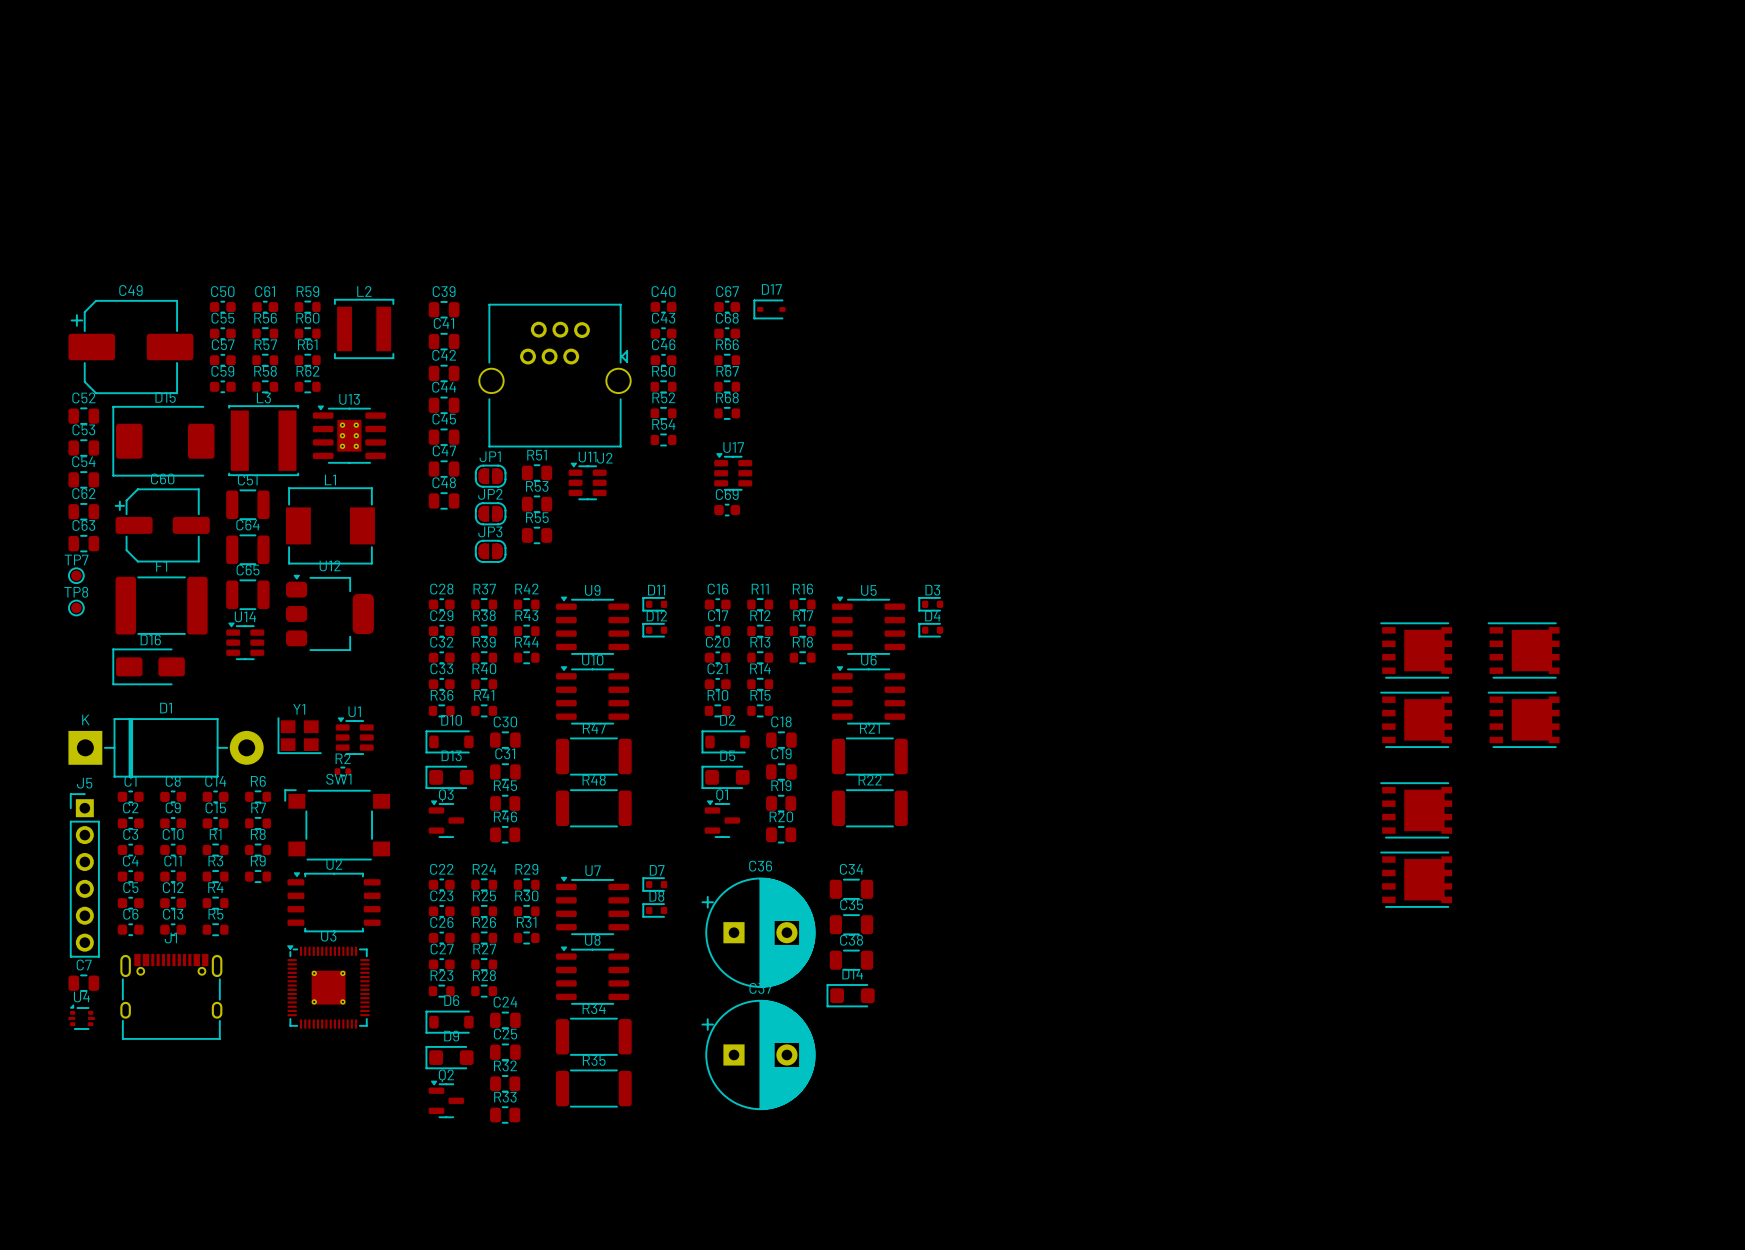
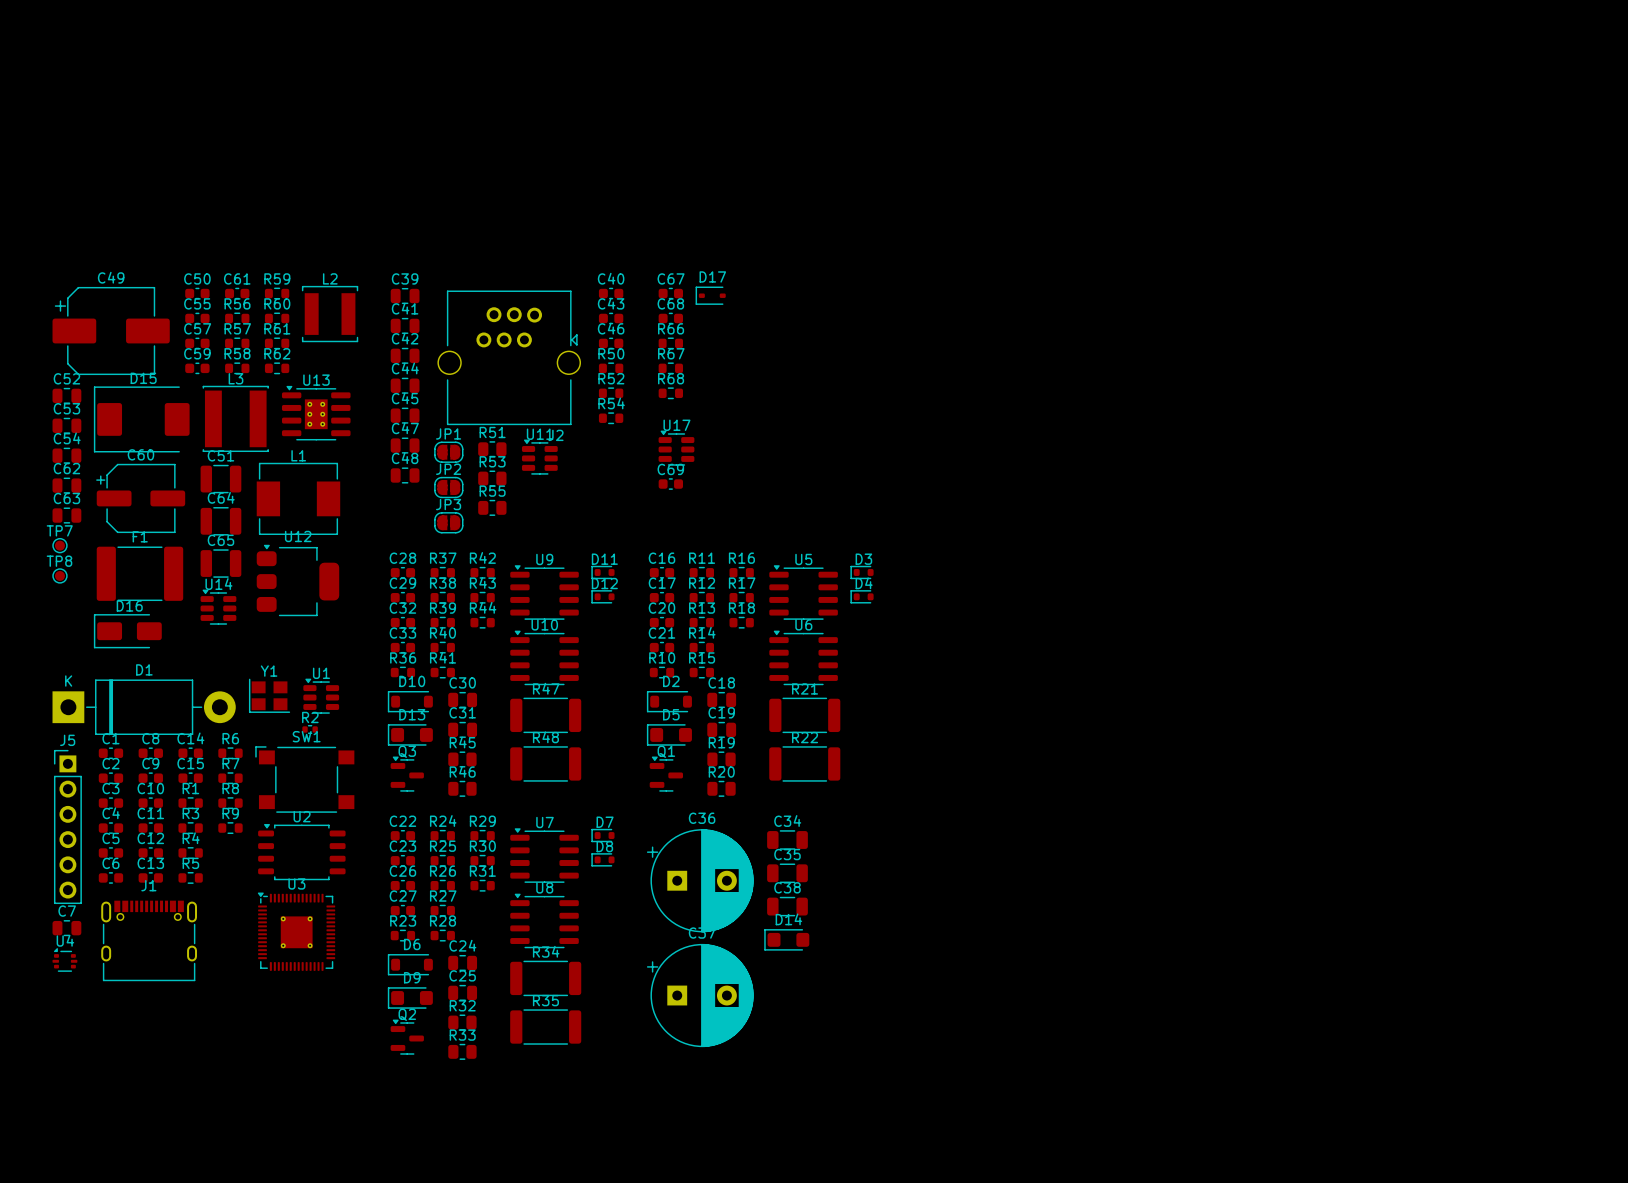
part: (1416, 650) -> none
part: (1523, 650) -> none
part: (1416, 719) -> none
part: (1523, 719) -> none
part: (1416, 810) -> none
part: (1416, 879) -> none

